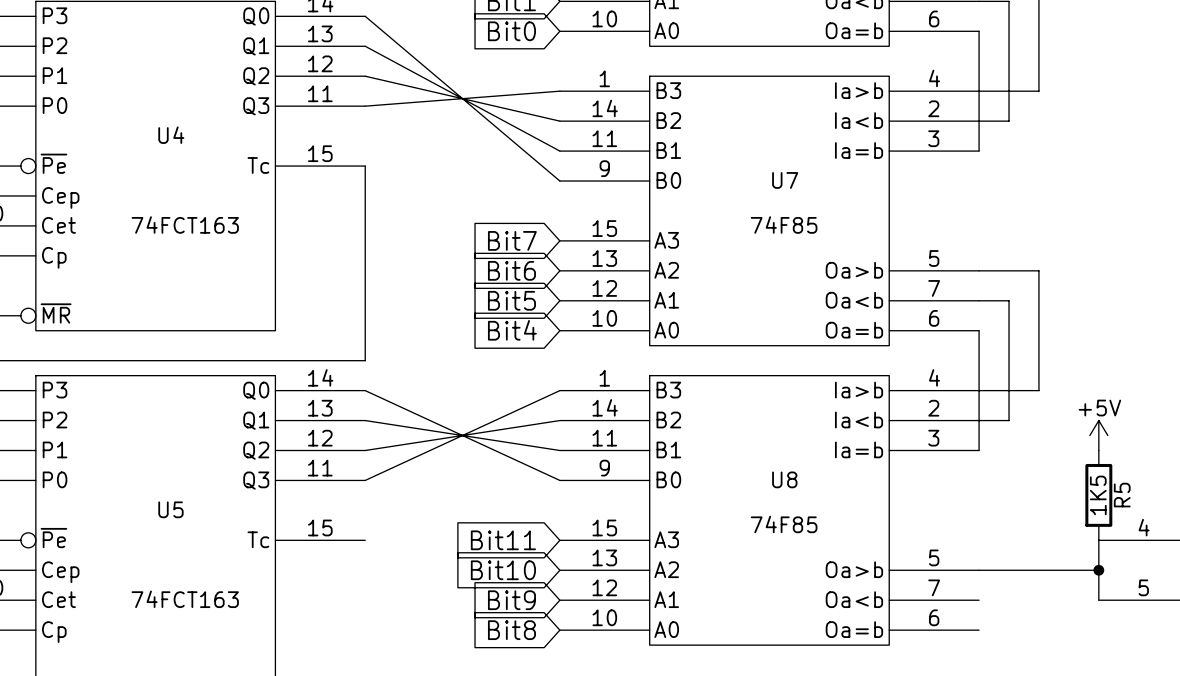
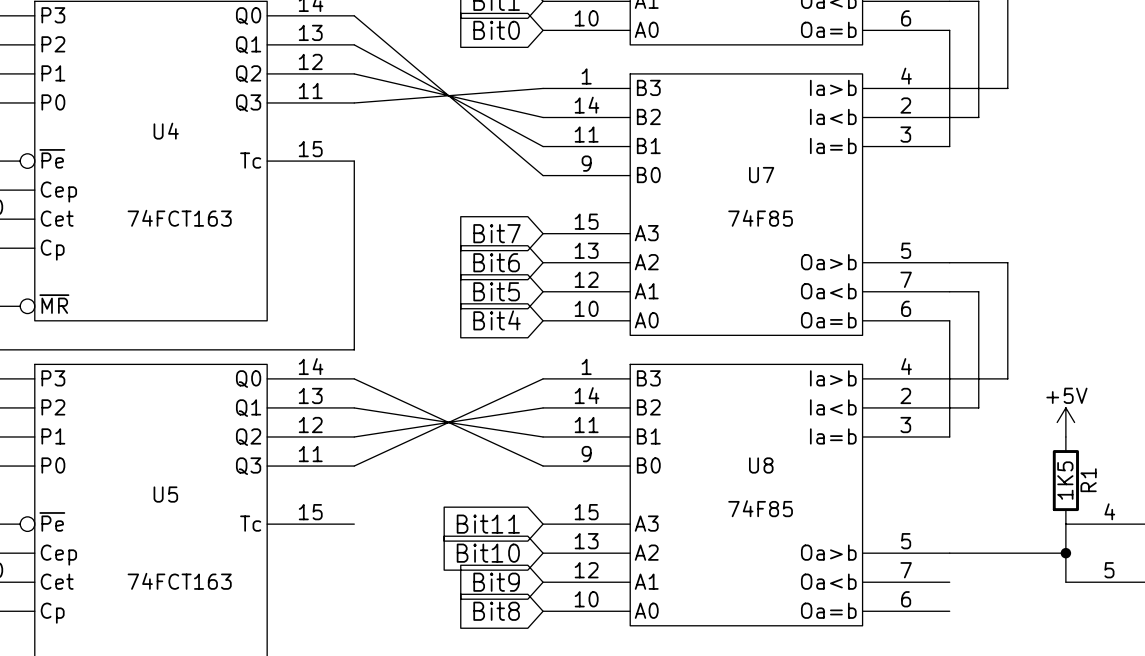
R5 name: R5 (1122, 495) -> R1 (1088, 480)

